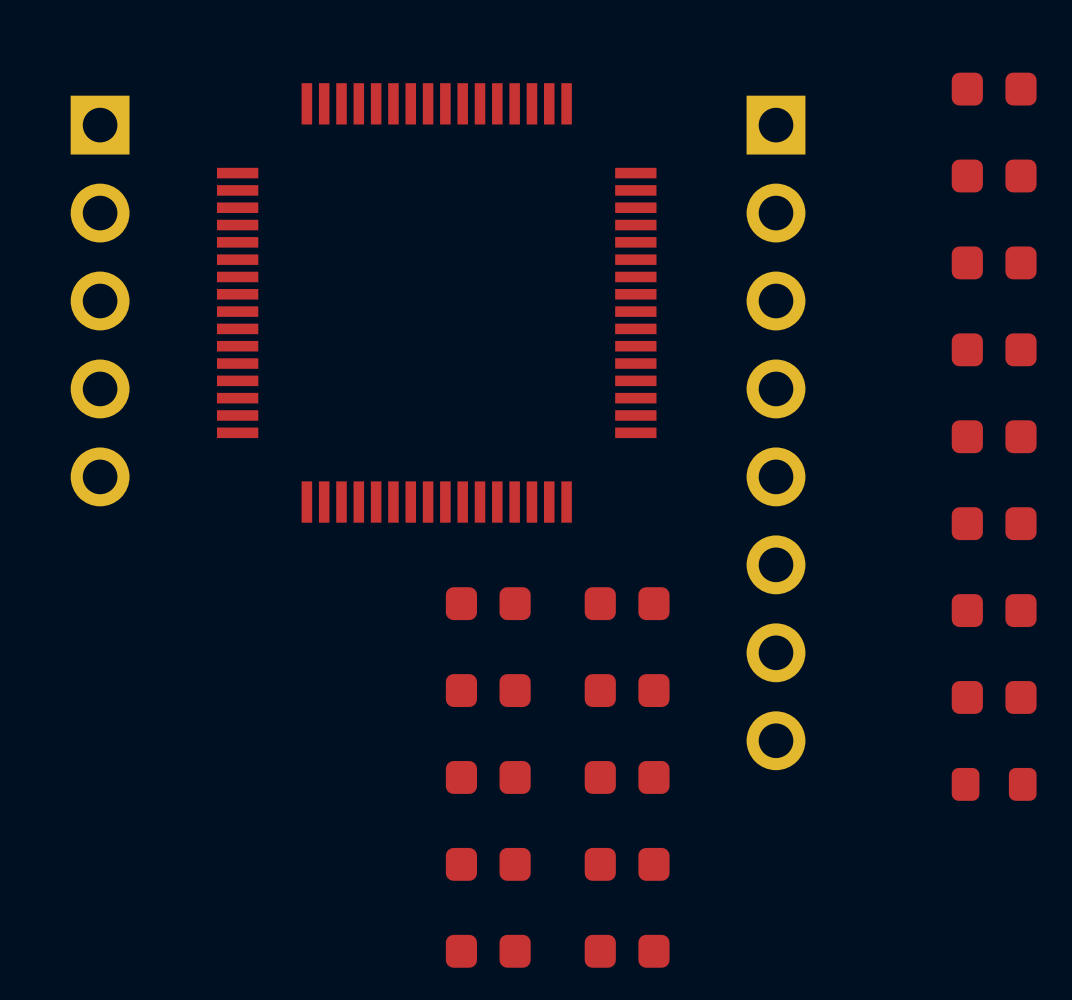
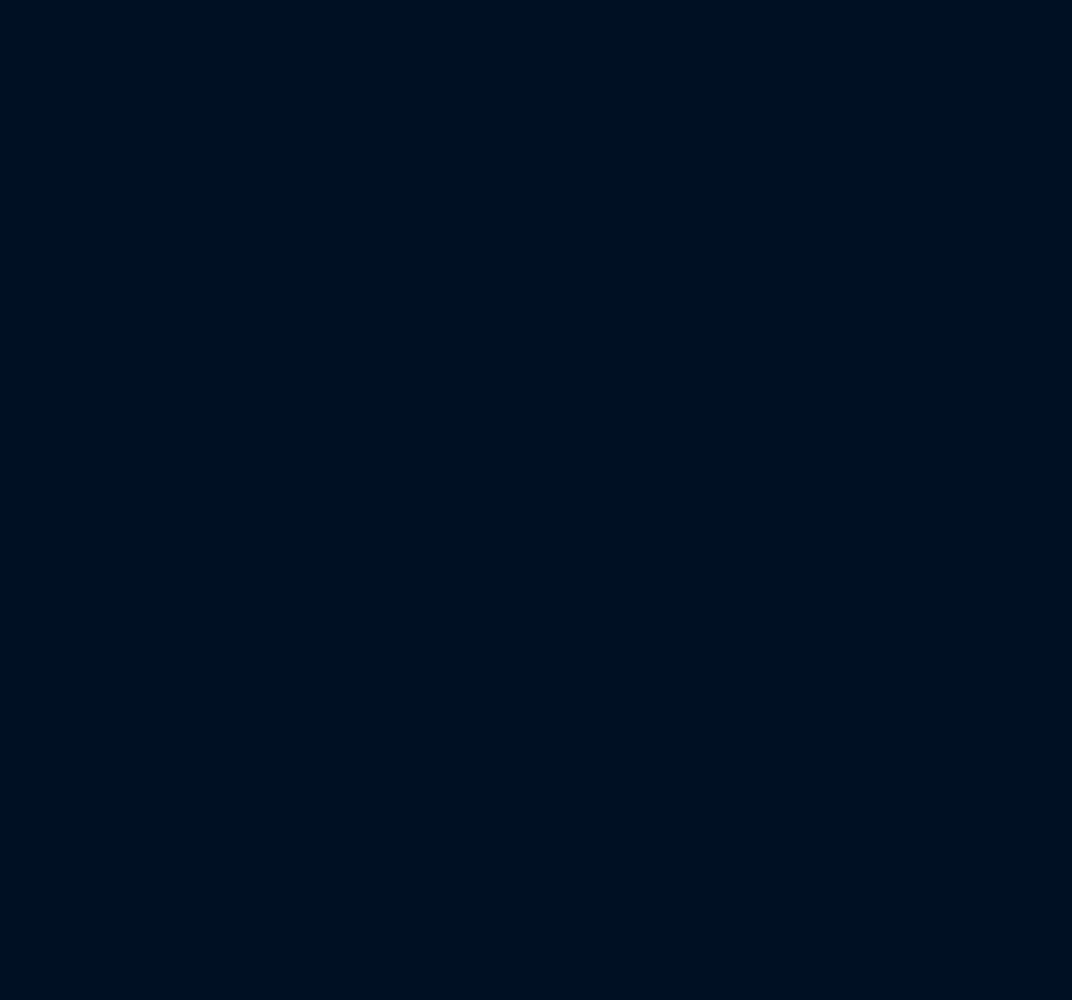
part: (994, 89) -> none
part: (994, 176) -> none
part: (994, 262) -> none
part: (100, 301) -> none
part: (436, 302) -> none
part: (994, 349) -> none
part: (776, 432) -> none
part: (994, 436) -> none
part: (994, 523) -> none
part: (488, 603) -> none
part: (627, 603) -> none
part: (994, 610) -> none
part: (488, 690) -> none
part: (627, 690) -> none
part: (994, 697) -> none
part: (488, 777) -> none
part: (627, 777) -> none
part: (994, 784) -> none
part: (488, 864) -> none
part: (627, 864) -> none
part: (488, 951) -> none
part: (627, 951) -> none

